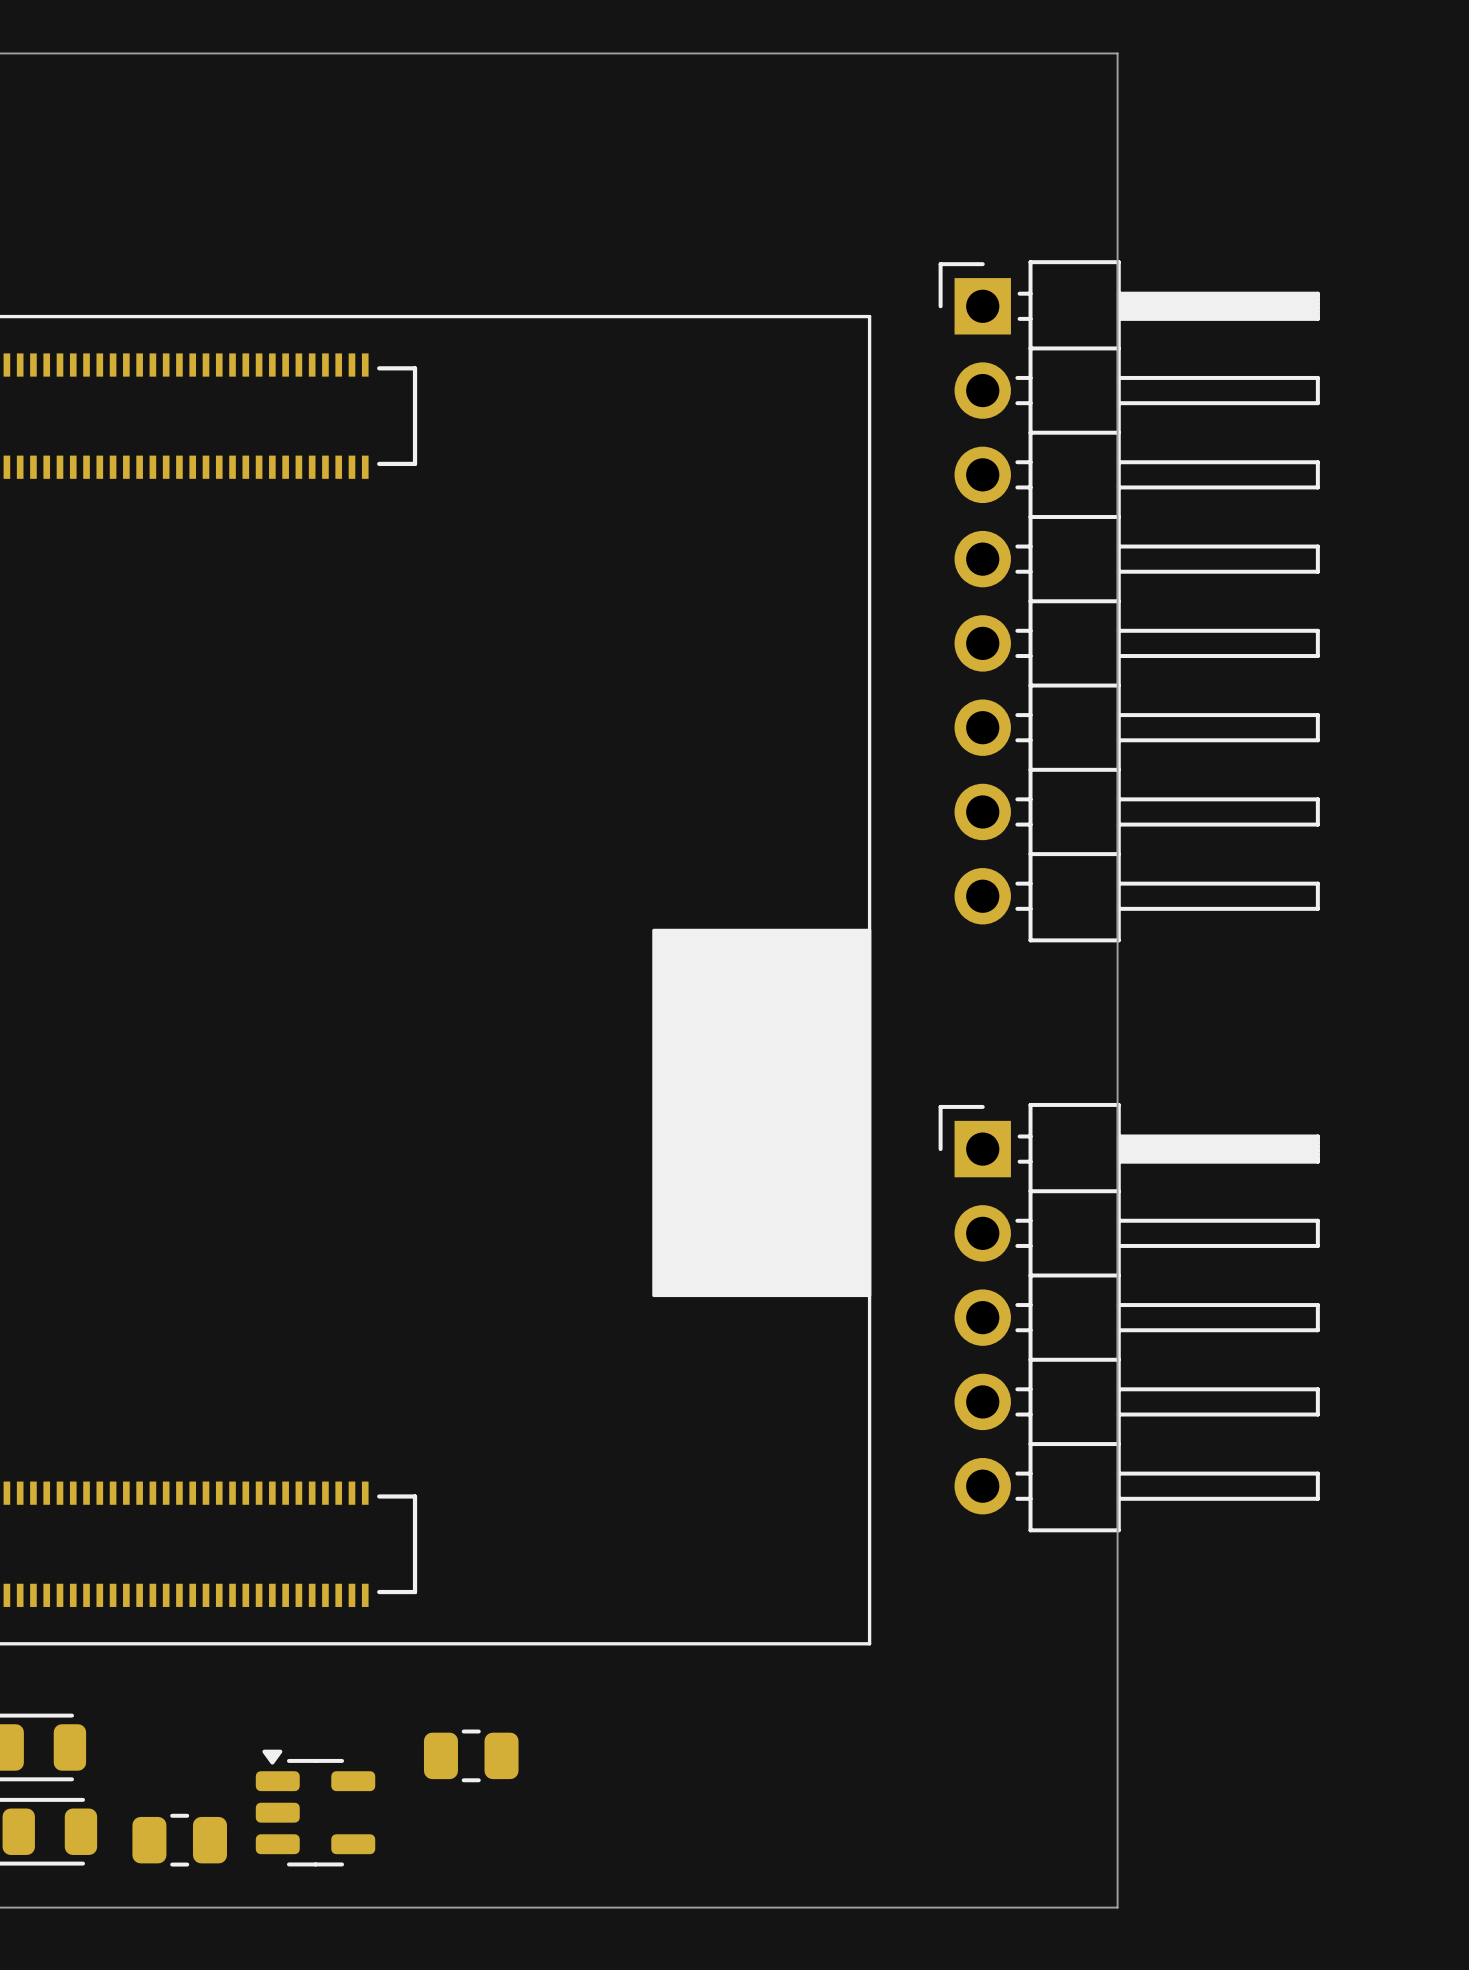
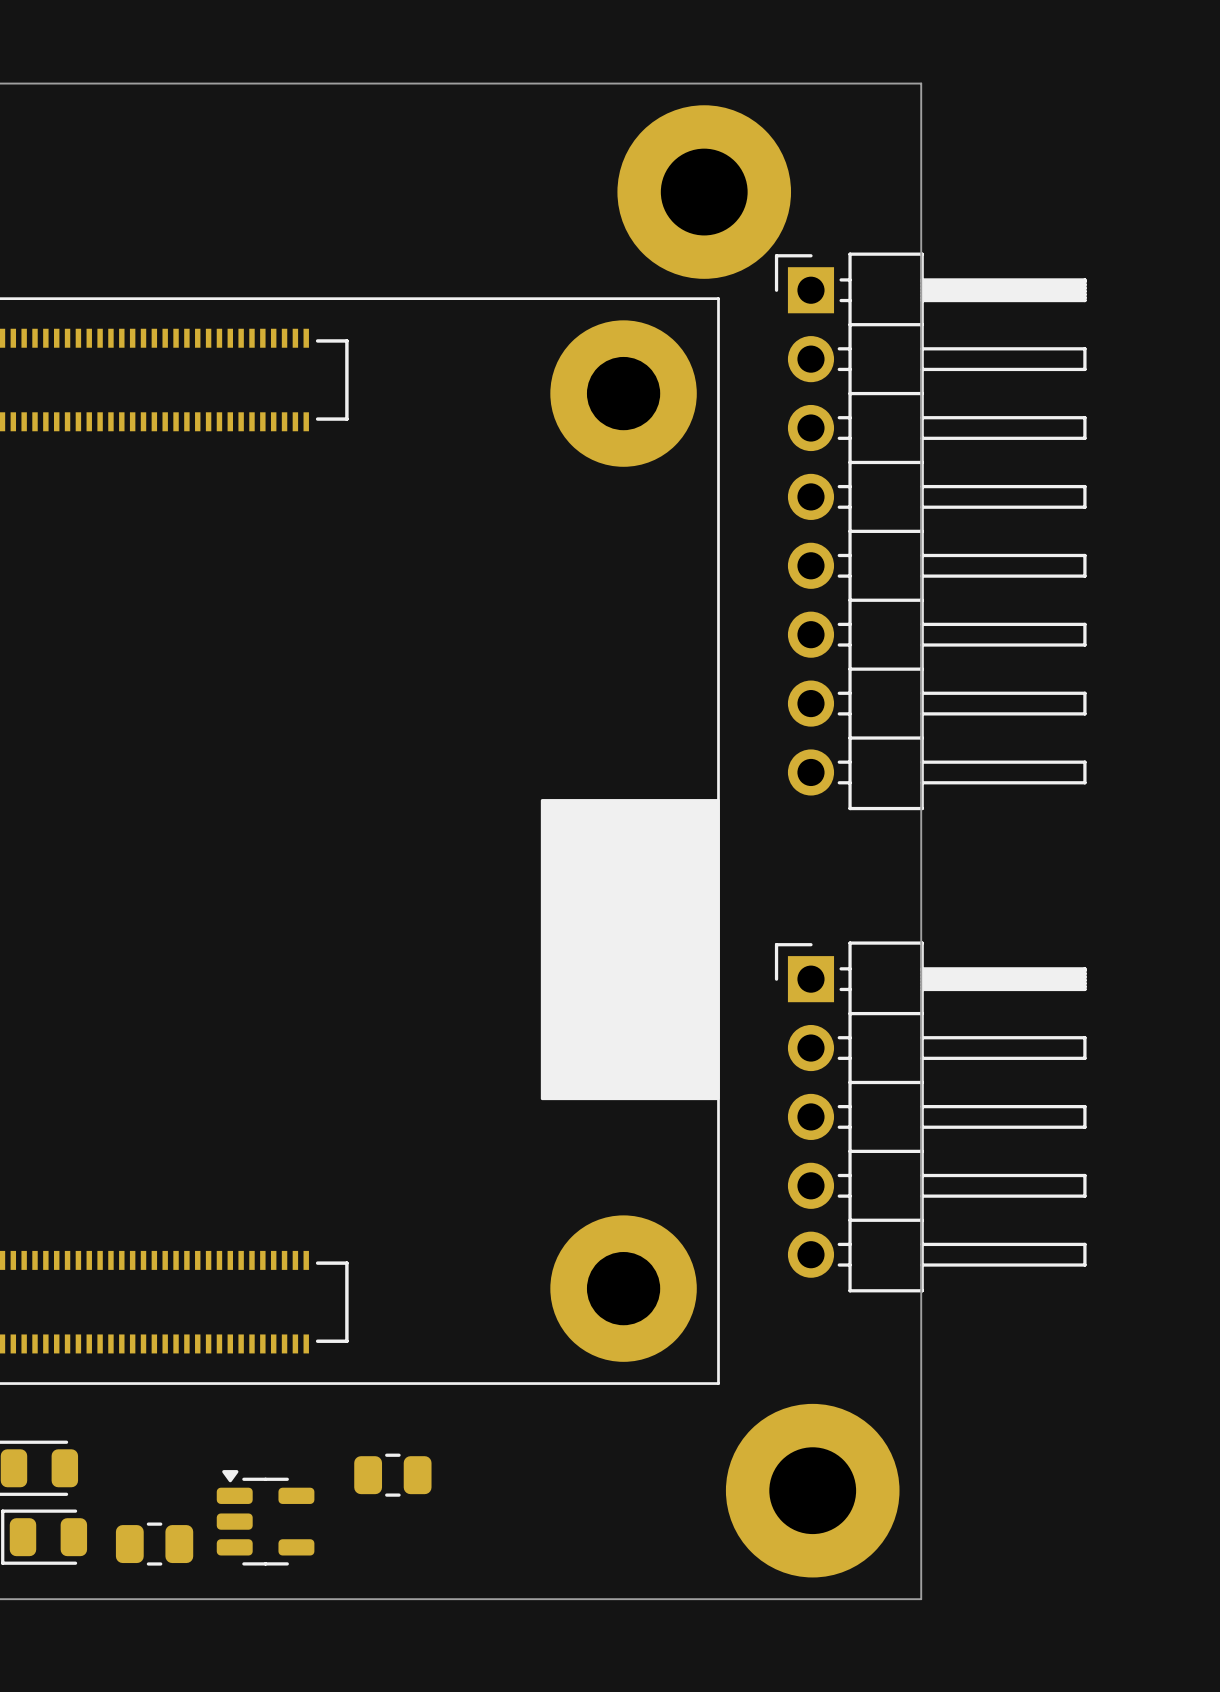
part: none -> (704, 192)
part: none -> (623, 393)
part: none -> (623, 1288)
part: none -> (812, 1490)

